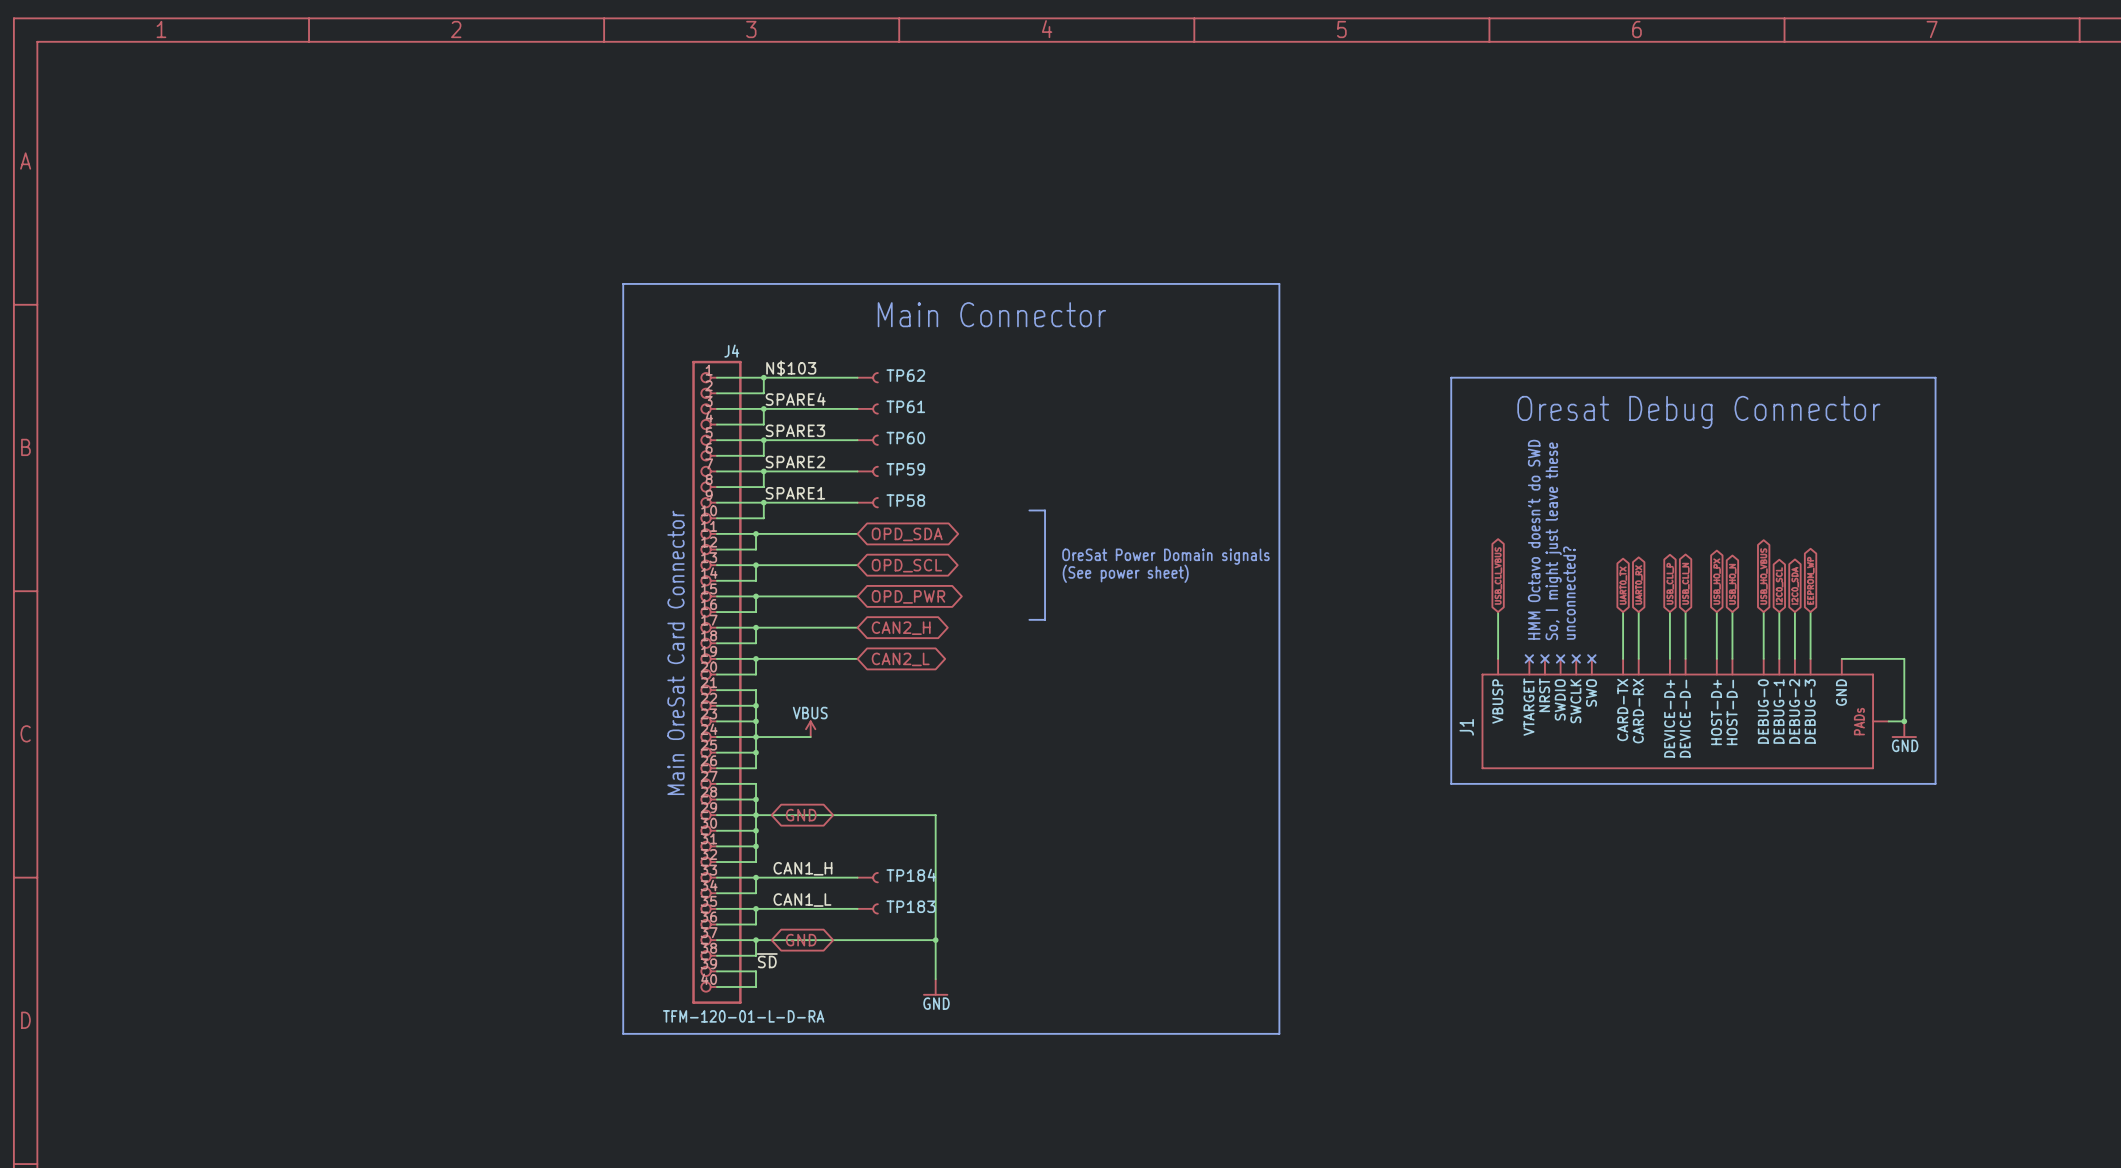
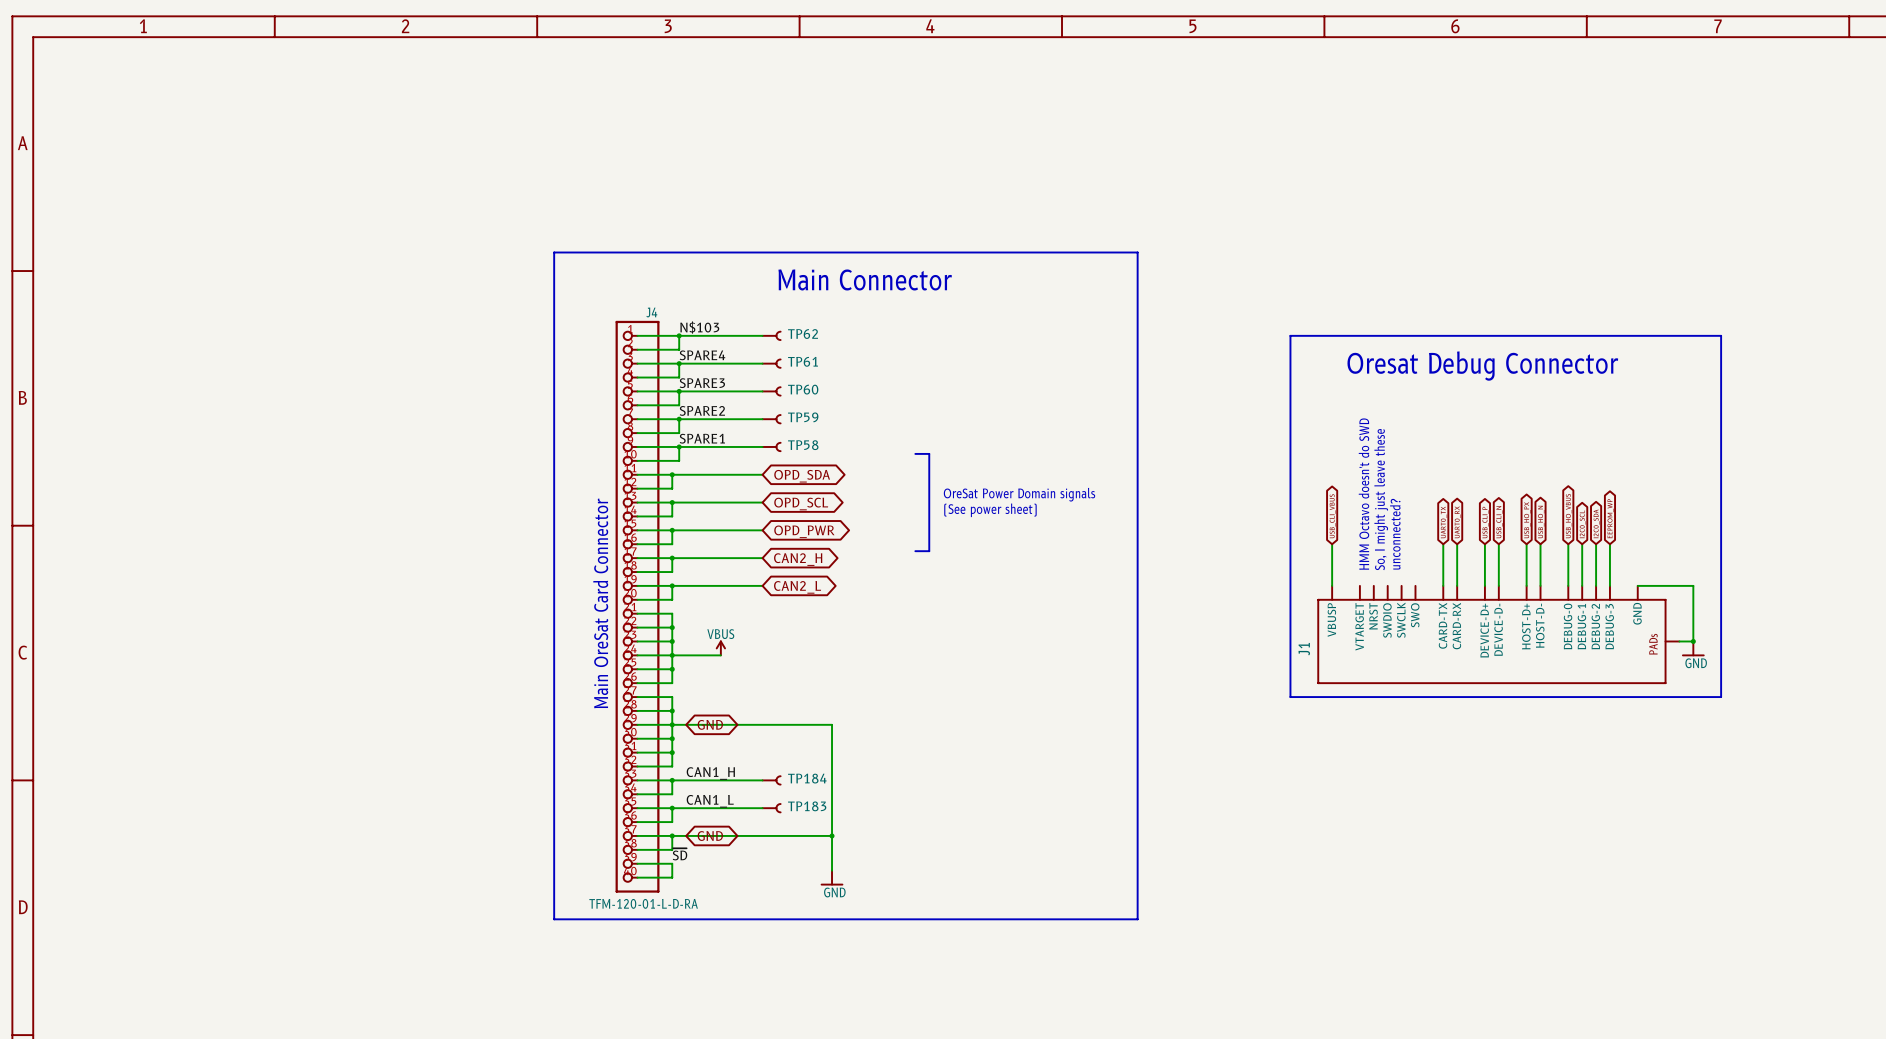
no-connect mark: (1529, 658) -> none
no-connect mark: (1544, 658) -> none
no-connect mark: (1560, 658) -> none
no-connect mark: (1576, 658) -> none
no-connect mark: (1591, 658) -> none

